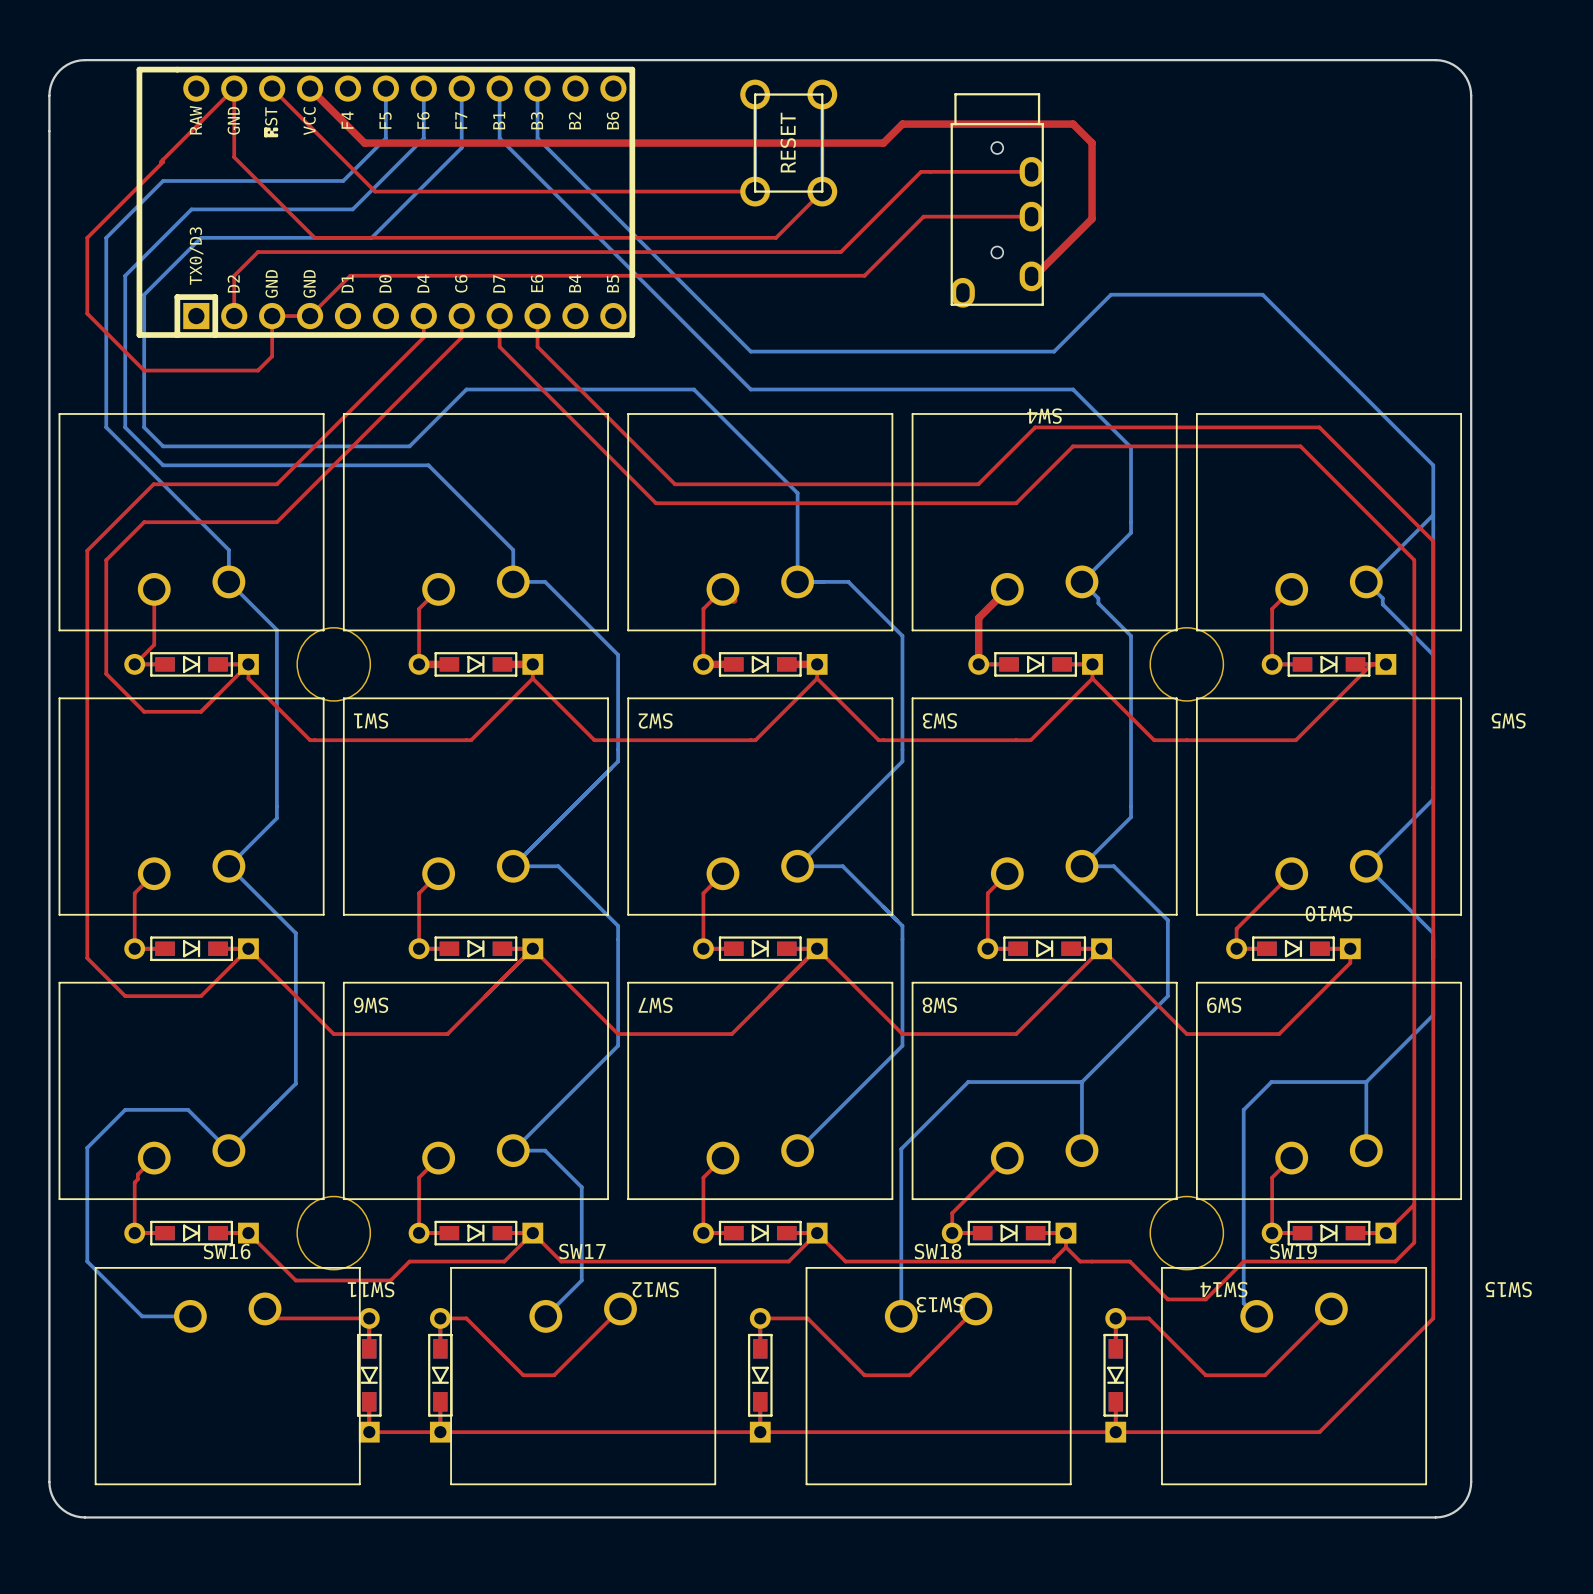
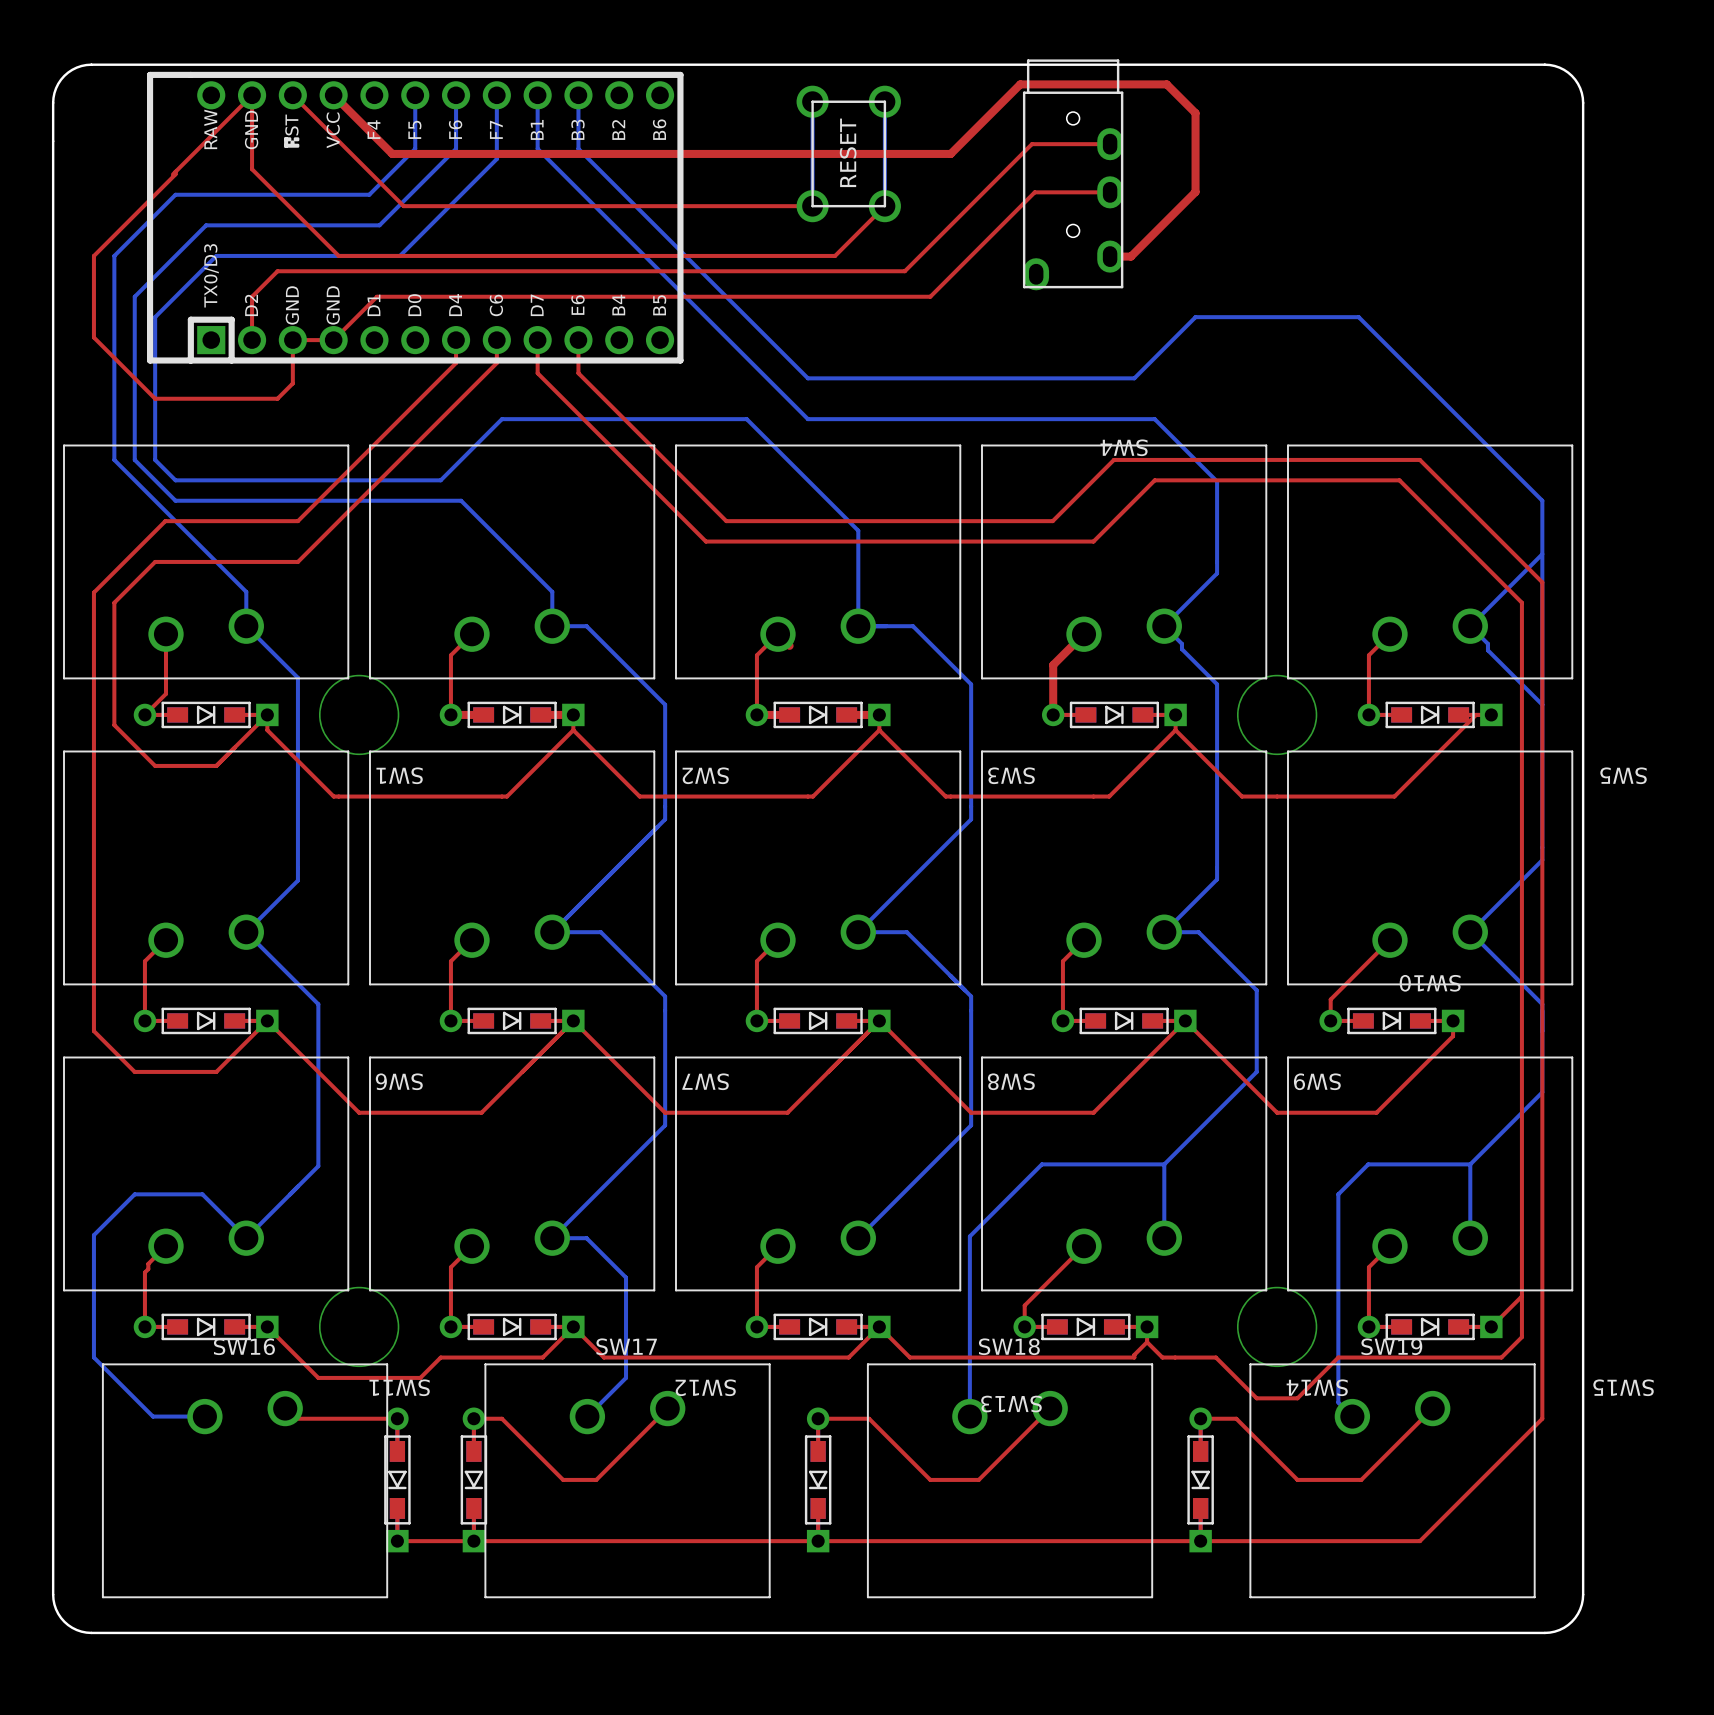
top track: (902, 124) (1073, 124) (1092, 143) (1092, 218) (1034, 276) (1031, 276) -> (971, 133) (1020, 84) (1166, 84) (1195, 113) (1195, 192) (1130, 256) (1110, 256)
top track: (921, 171) (1031, 171) -> (991, 184) (1031, 144) (1110, 144)
part position: (997, 200) -> (1073, 174)
top track: (923, 216) (1031, 216) -> (993, 233) (1034, 192) (1110, 192)

